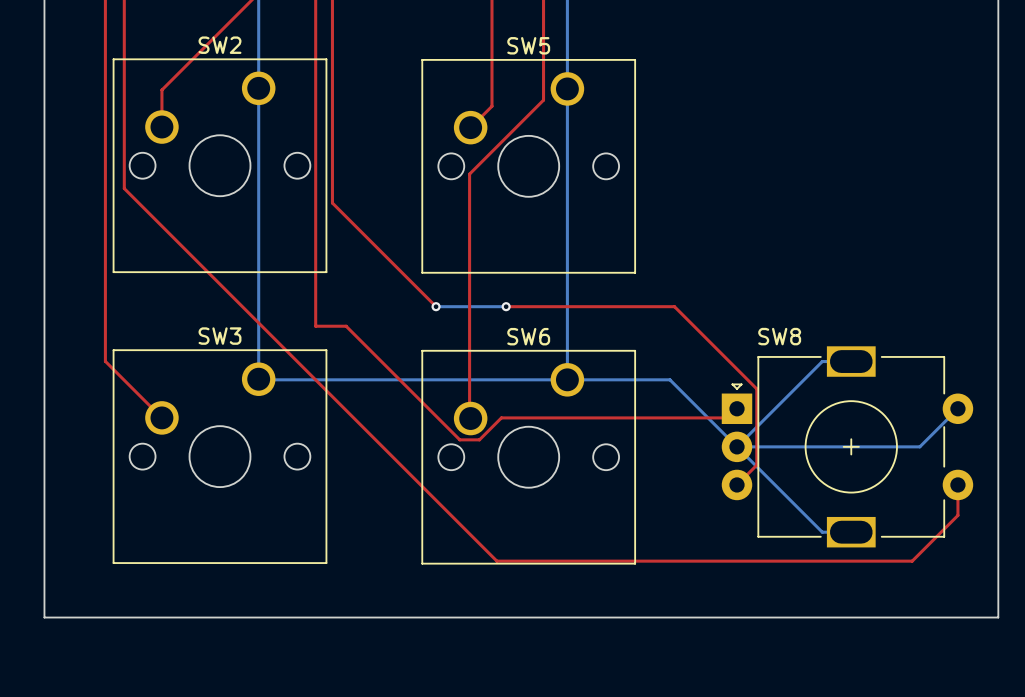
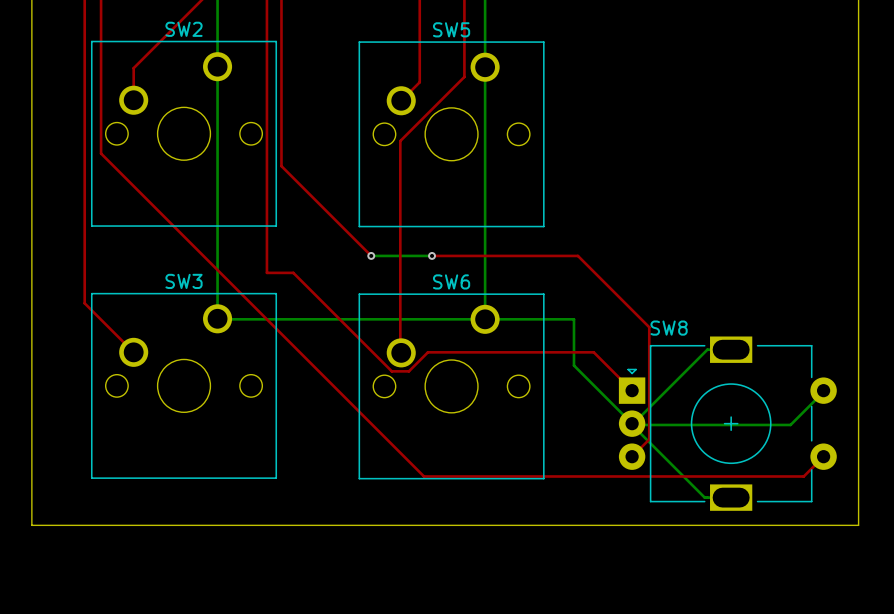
bottom track: (851, 361) (822, 361) (737, 446) (919, 446) (957, 408) -> none
bottom track: (669, 379) (822, 532) (851, 532) -> (573, 319) (573, 365) (632, 423)
top track: (737, 408) (727, 417) (692, 417) -> (632, 390) (593, 352)
bottom track: none -> (731, 349) (707, 349) (632, 424)
SW8 position: (847, 446) -> (727, 423)
bottom track: none -> (823, 391) (790, 424) (632, 424)
top track: (756, 465) (737, 484) -> (649, 393) (649, 439) (632, 456)
top track: (957, 484) (957, 515) (912, 561) -> (823, 456) (803, 476) (783, 476)
bottom track: none -> (632, 424) (704, 497) (731, 497)

